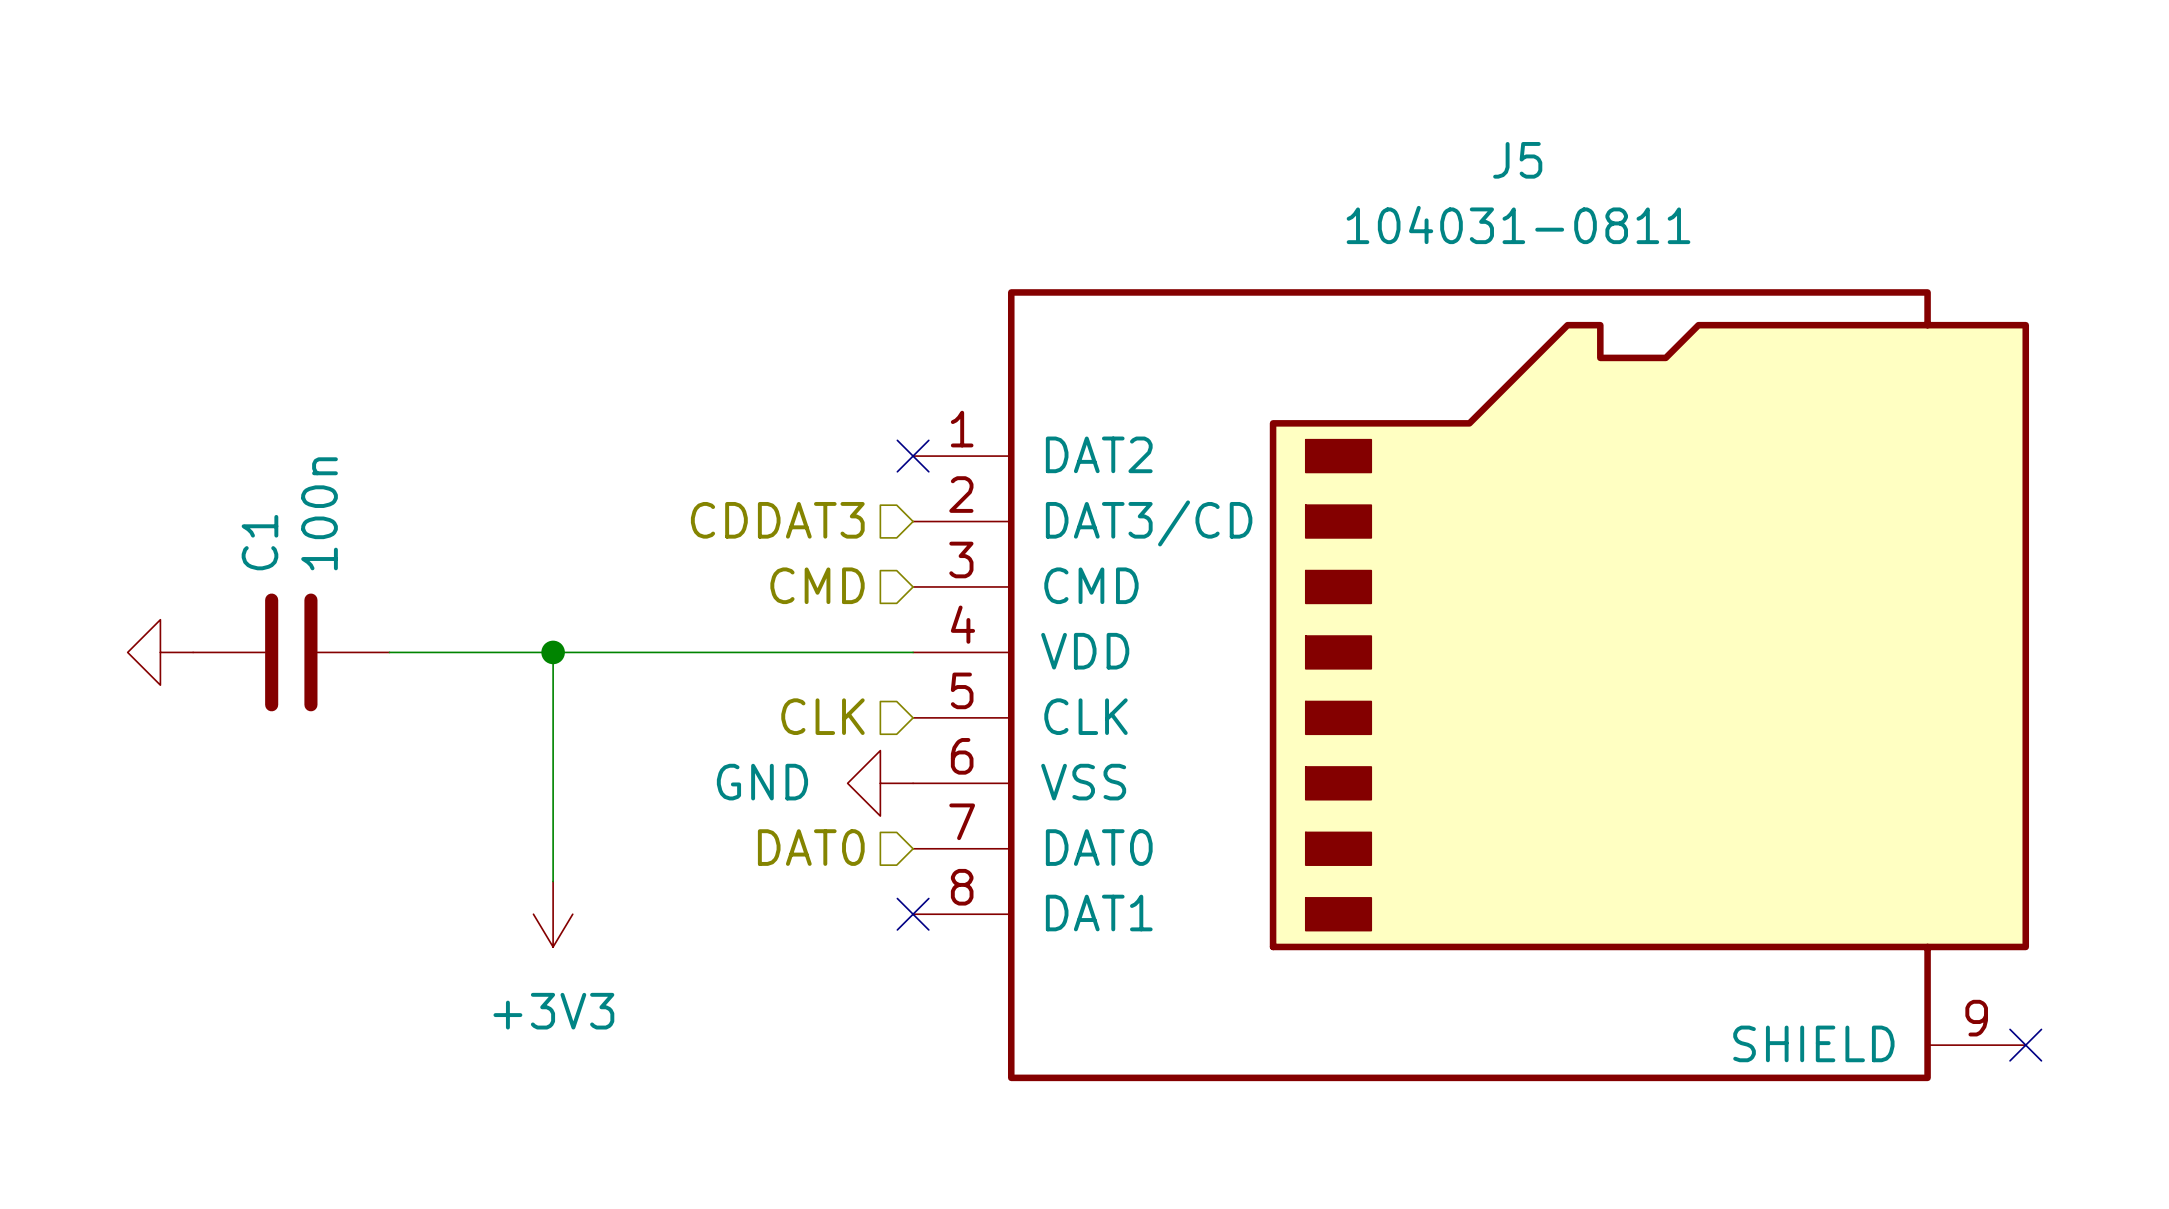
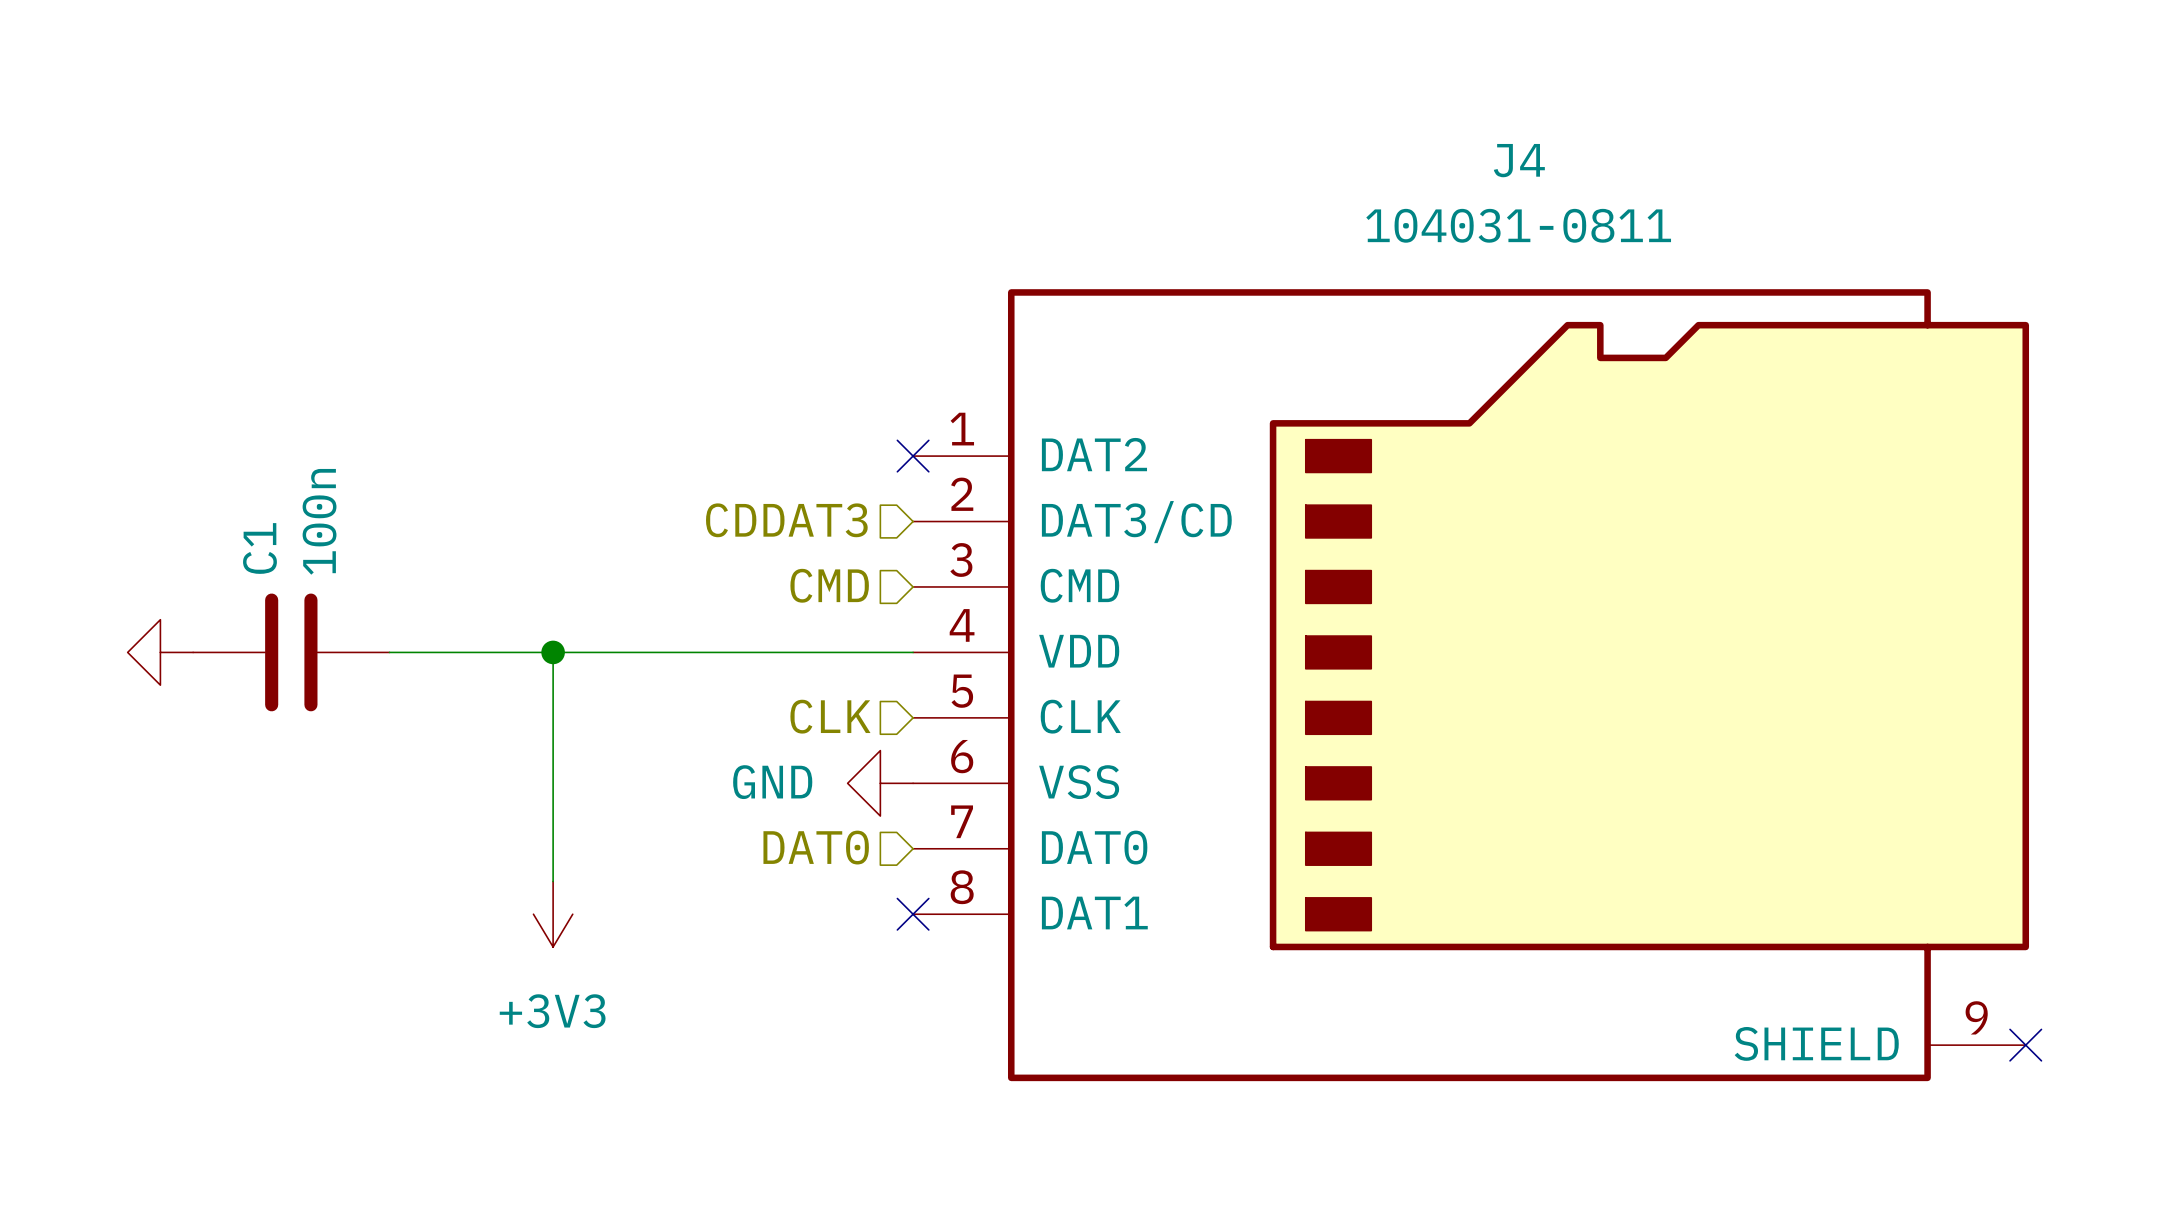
J5 name: J5 (1517, 160) -> J4 (1519, 160)

